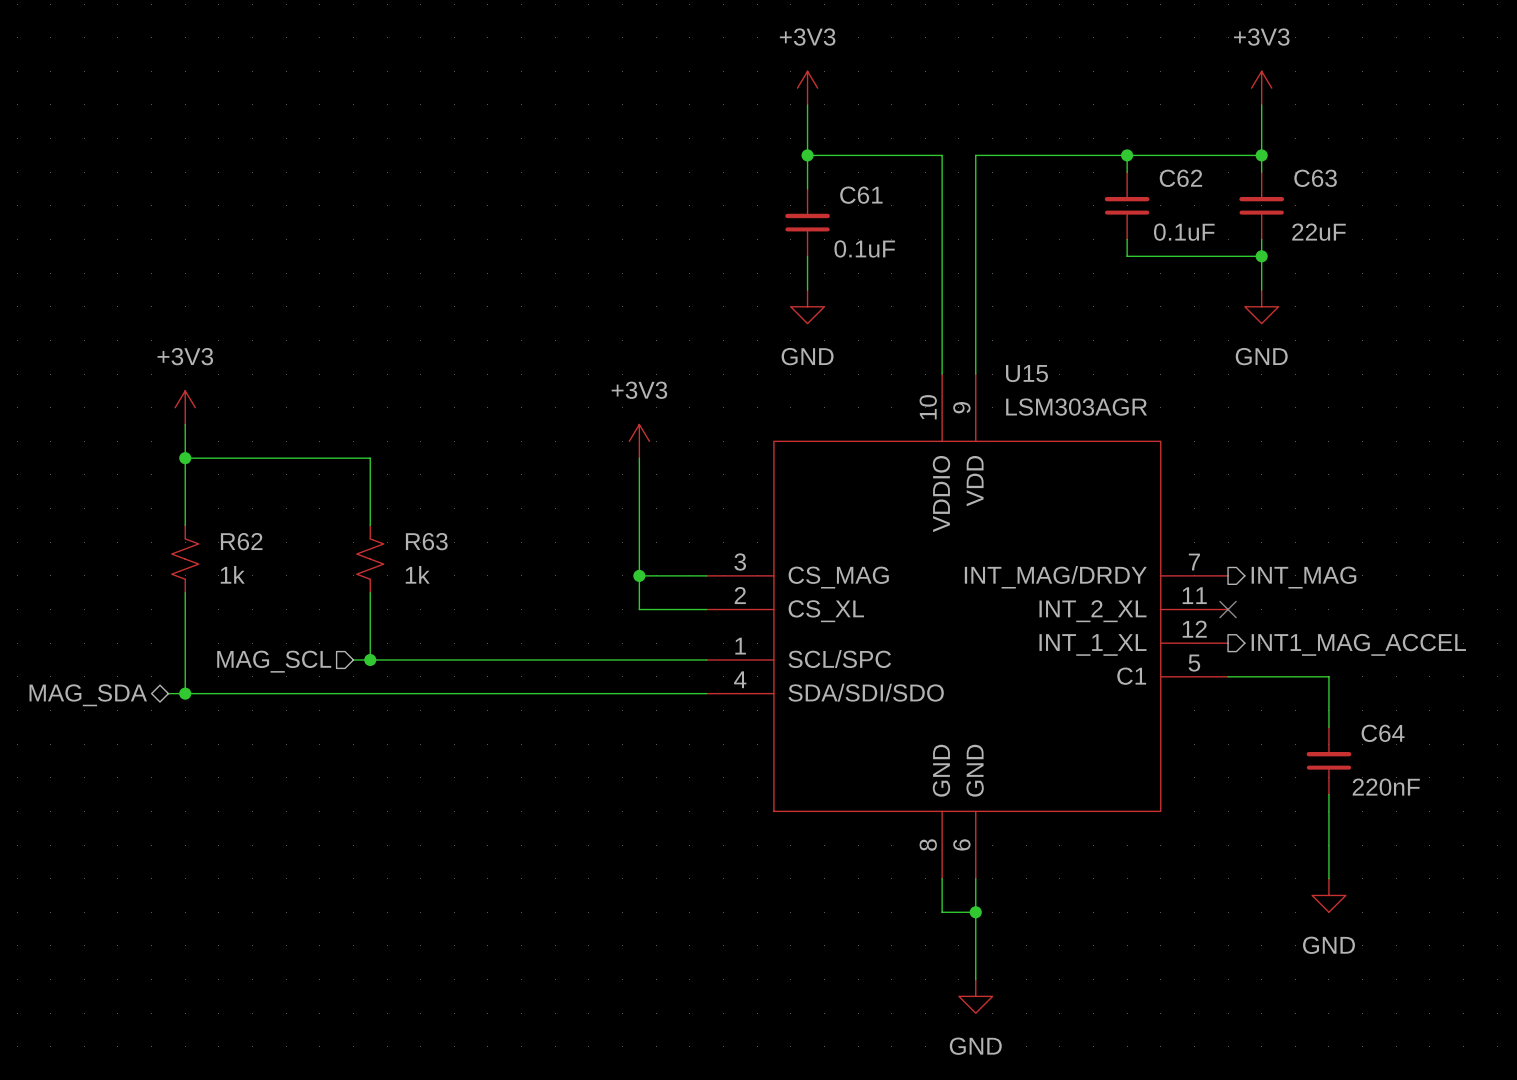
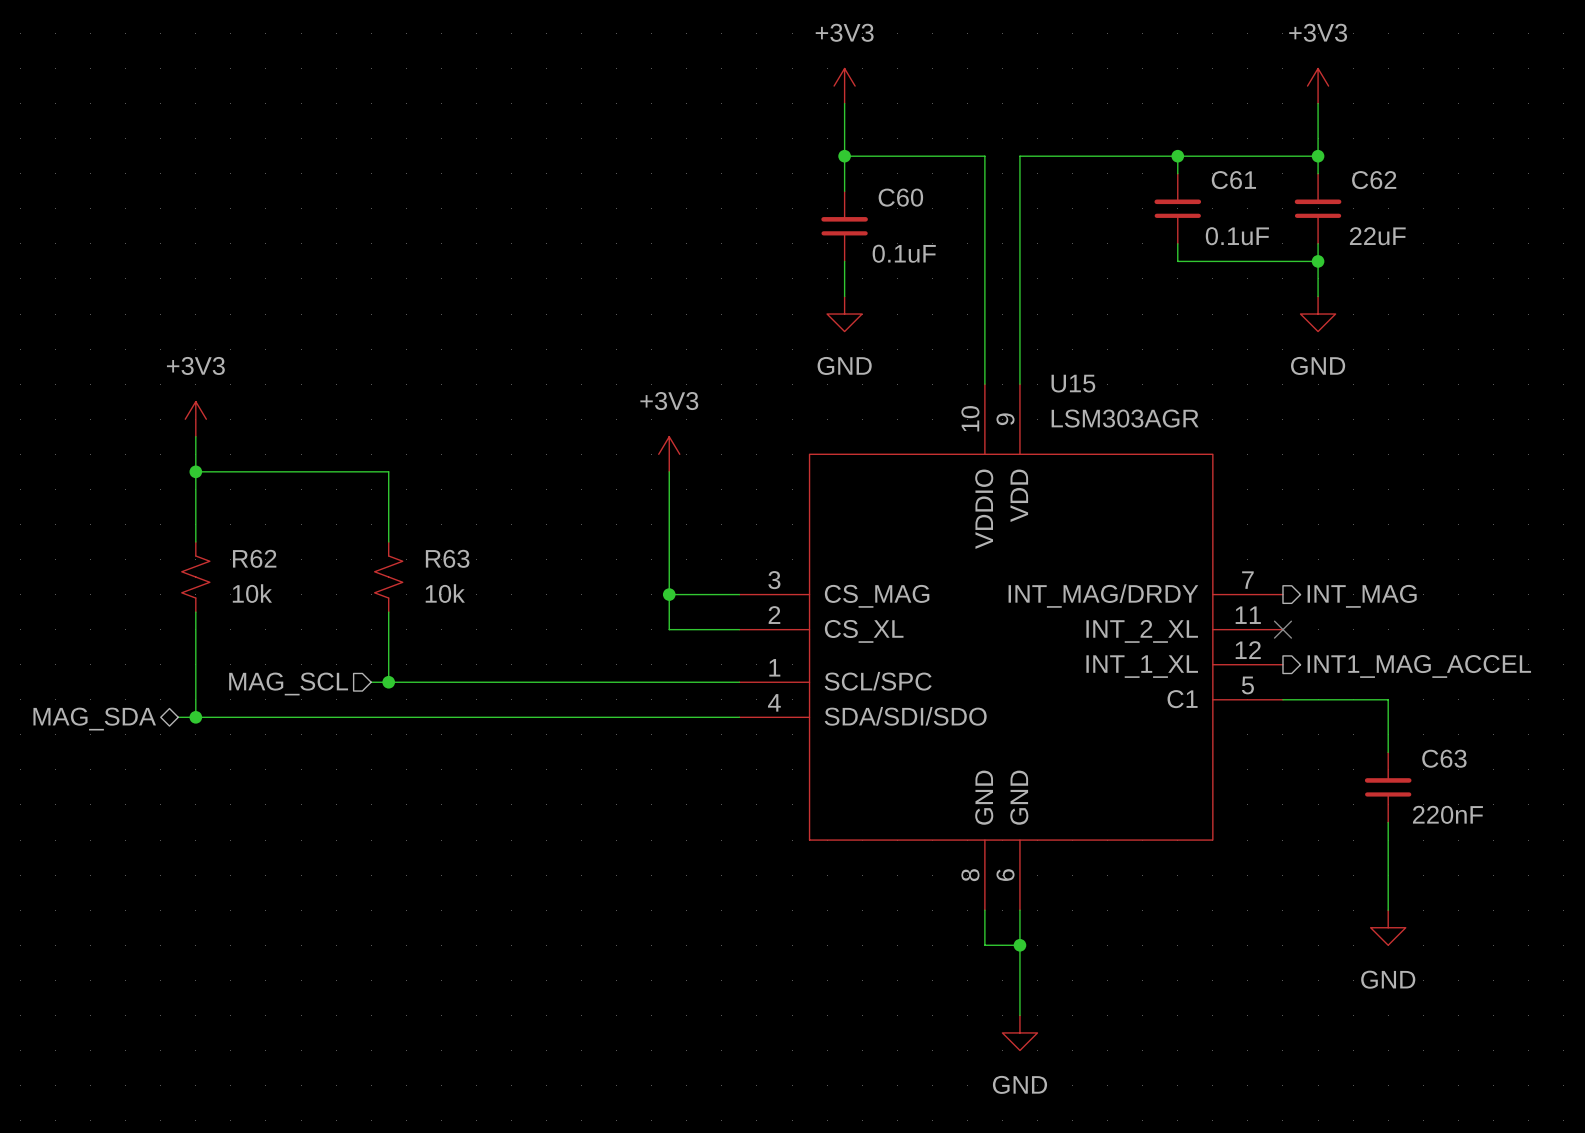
C62 name: C62 (1180, 178) -> C61 (1233, 180)
C63 name: C63 (1315, 178) -> C62 (1374, 180)
C61 name: C61 (861, 195) -> C60 (900, 197)
R62 value: 1k (232, 574) -> 10k (252, 593)
R63 value: 1k (417, 574) -> 10k (445, 593)
C64 name: C64 (1383, 733) -> C63 (1444, 758)

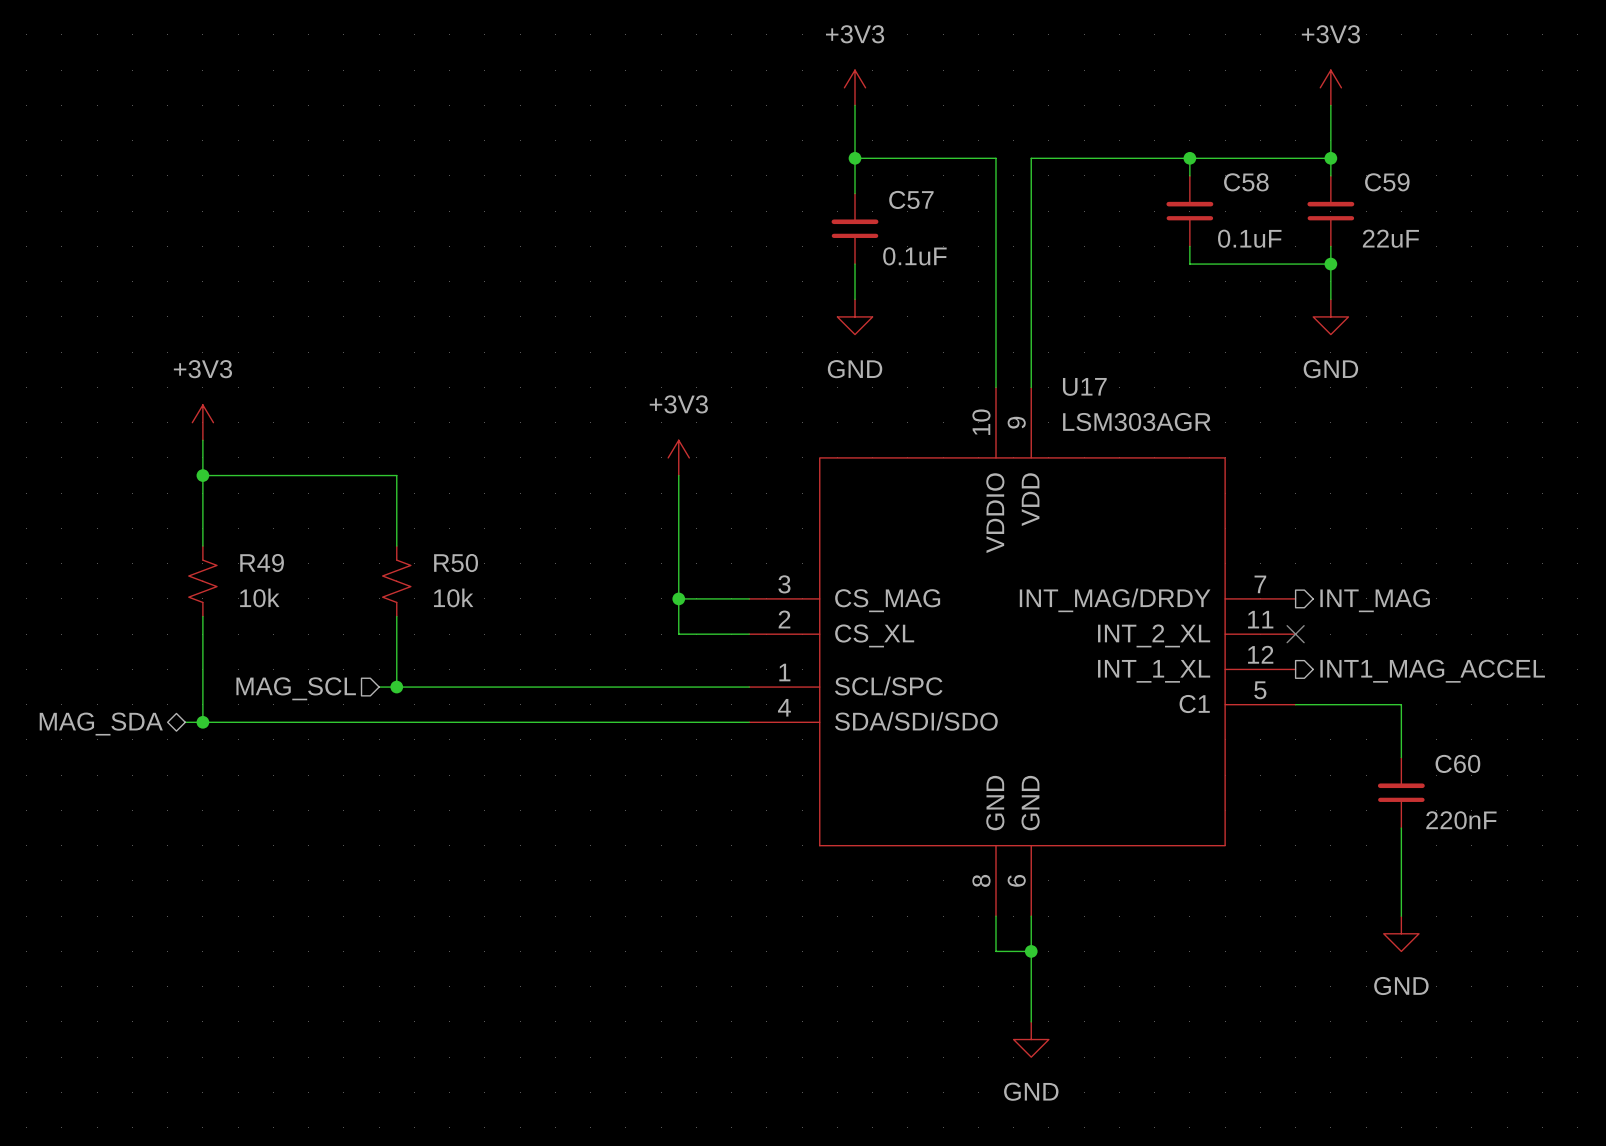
C61 name: C61 (1233, 180) -> C58 (1246, 182)
C62 name: C62 (1374, 180) -> C59 (1387, 182)
C60 name: C60 (900, 197) -> C57 (911, 199)
U15 name: U15 (1073, 383) -> U17 (1084, 386)
R62 name: R62 (254, 558) -> R49 (262, 563)
R63 name: R63 (447, 558) -> R50 (456, 563)
C63 name: C63 (1444, 758) -> C60 (1457, 763)

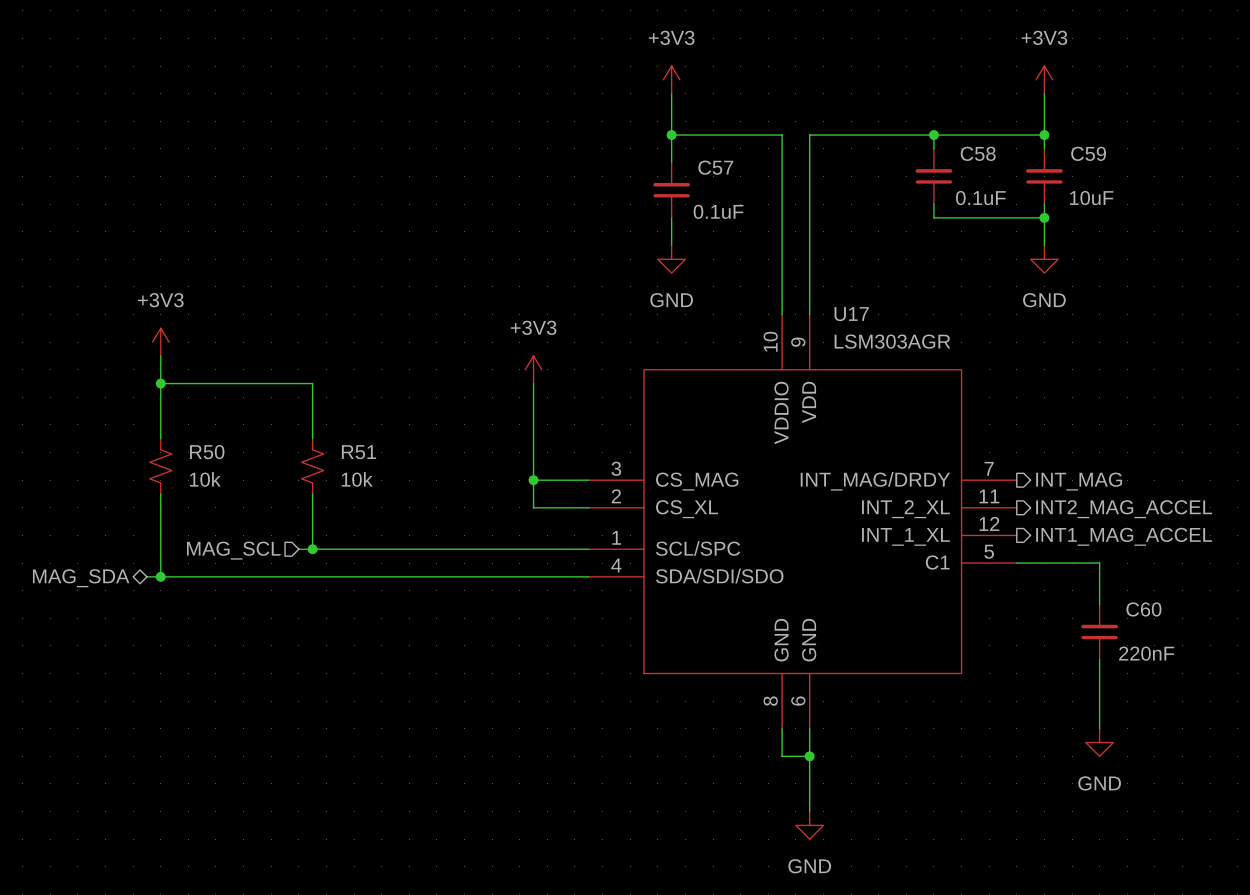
C59 value: 22uF (1390, 238) -> 10uF (1091, 198)
R49 name: R49 (262, 563) -> R50 (207, 452)
R50 name: R50 (456, 563) -> R51 (359, 452)
no-connect mark: (1295, 634) -> none
hierarchical label: none -> INT2_MAG_ACCEL (1124, 509)

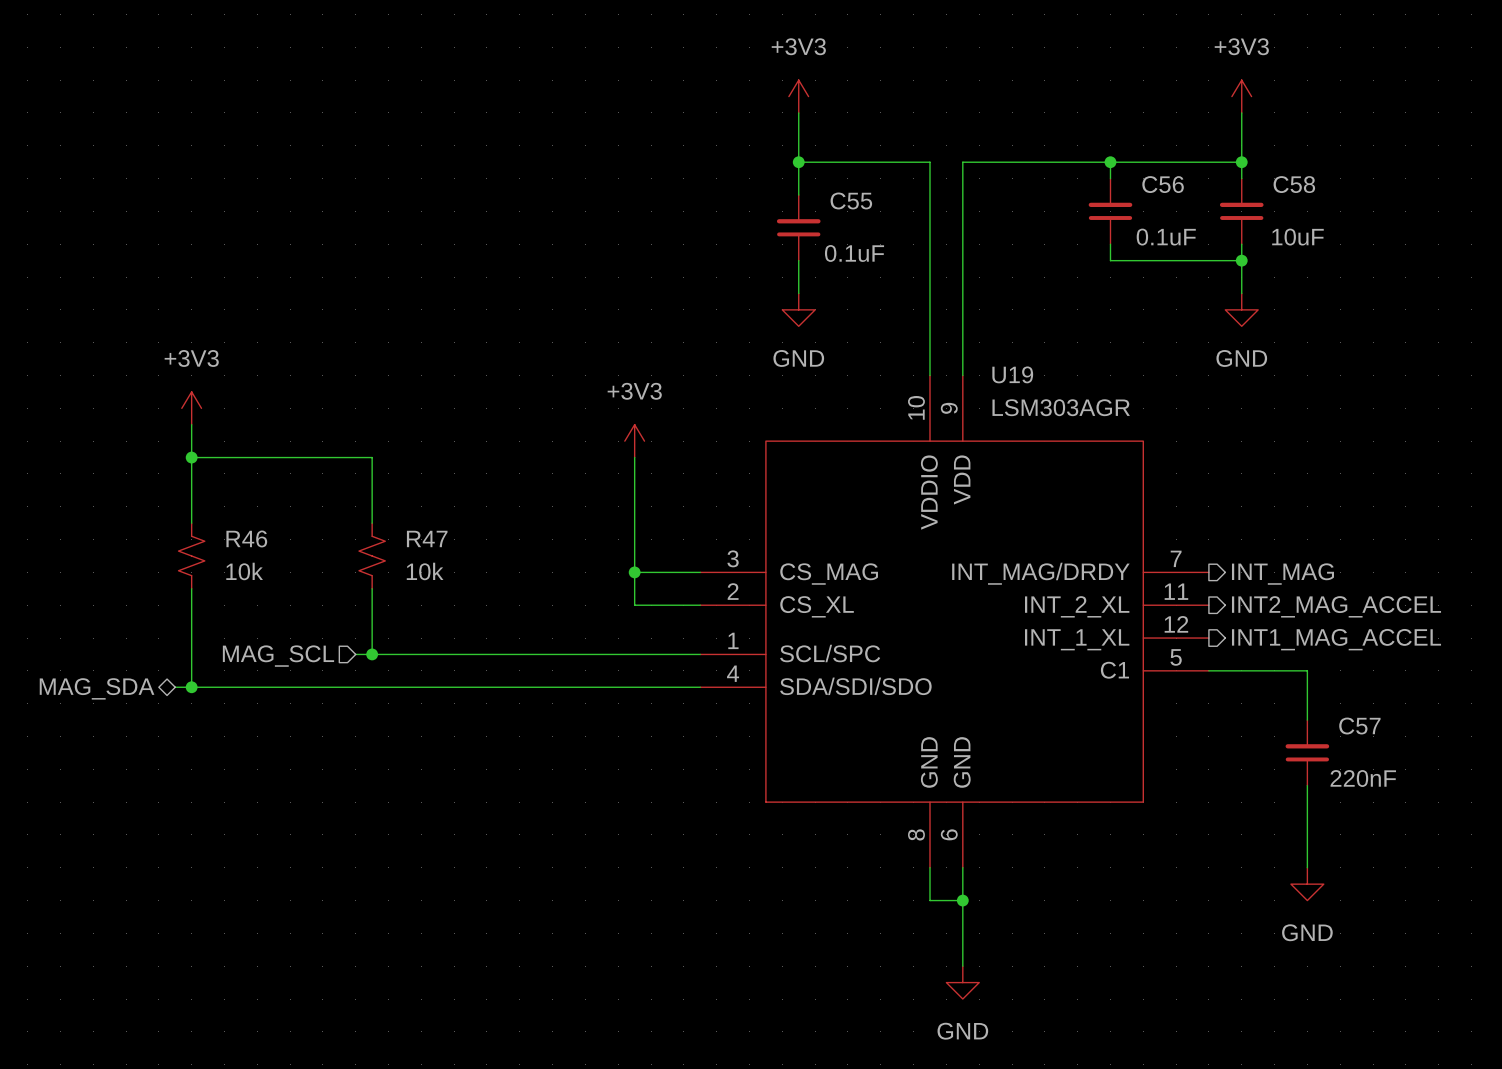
C58 name: C58 (978, 153) -> C56 (1163, 184)
C59 name: C59 (1088, 153) -> C58 (1294, 184)
C57 name: C57 (715, 167) -> C55 (851, 200)
U17 name: U17 (851, 314) -> U19 (1012, 374)
R50 name: R50 (207, 452) -> R46 (246, 538)
R51 name: R51 (359, 452) -> R47 (427, 538)
C60 name: C60 (1143, 609) -> C57 (1359, 726)

